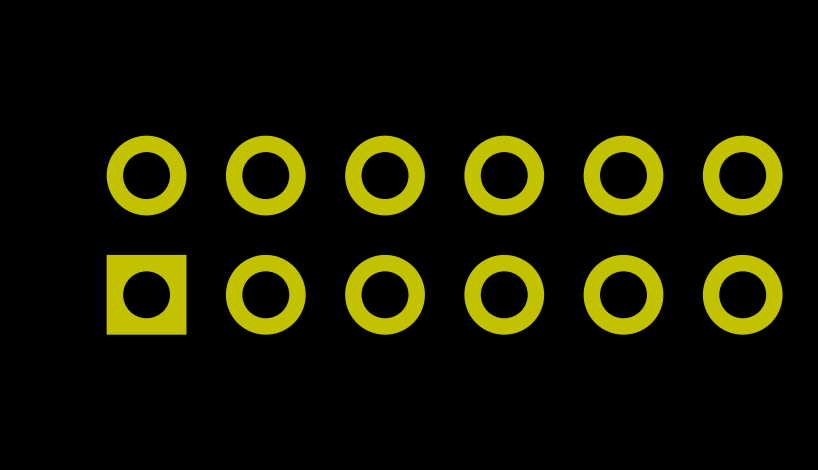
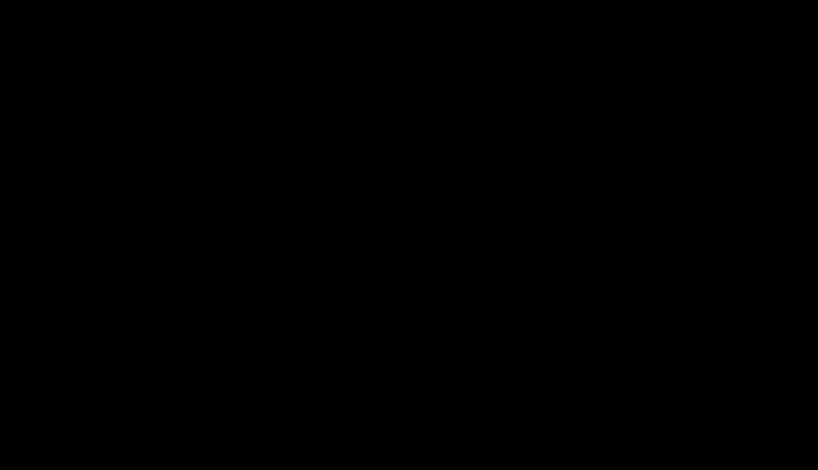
part: (444, 235) -> none

